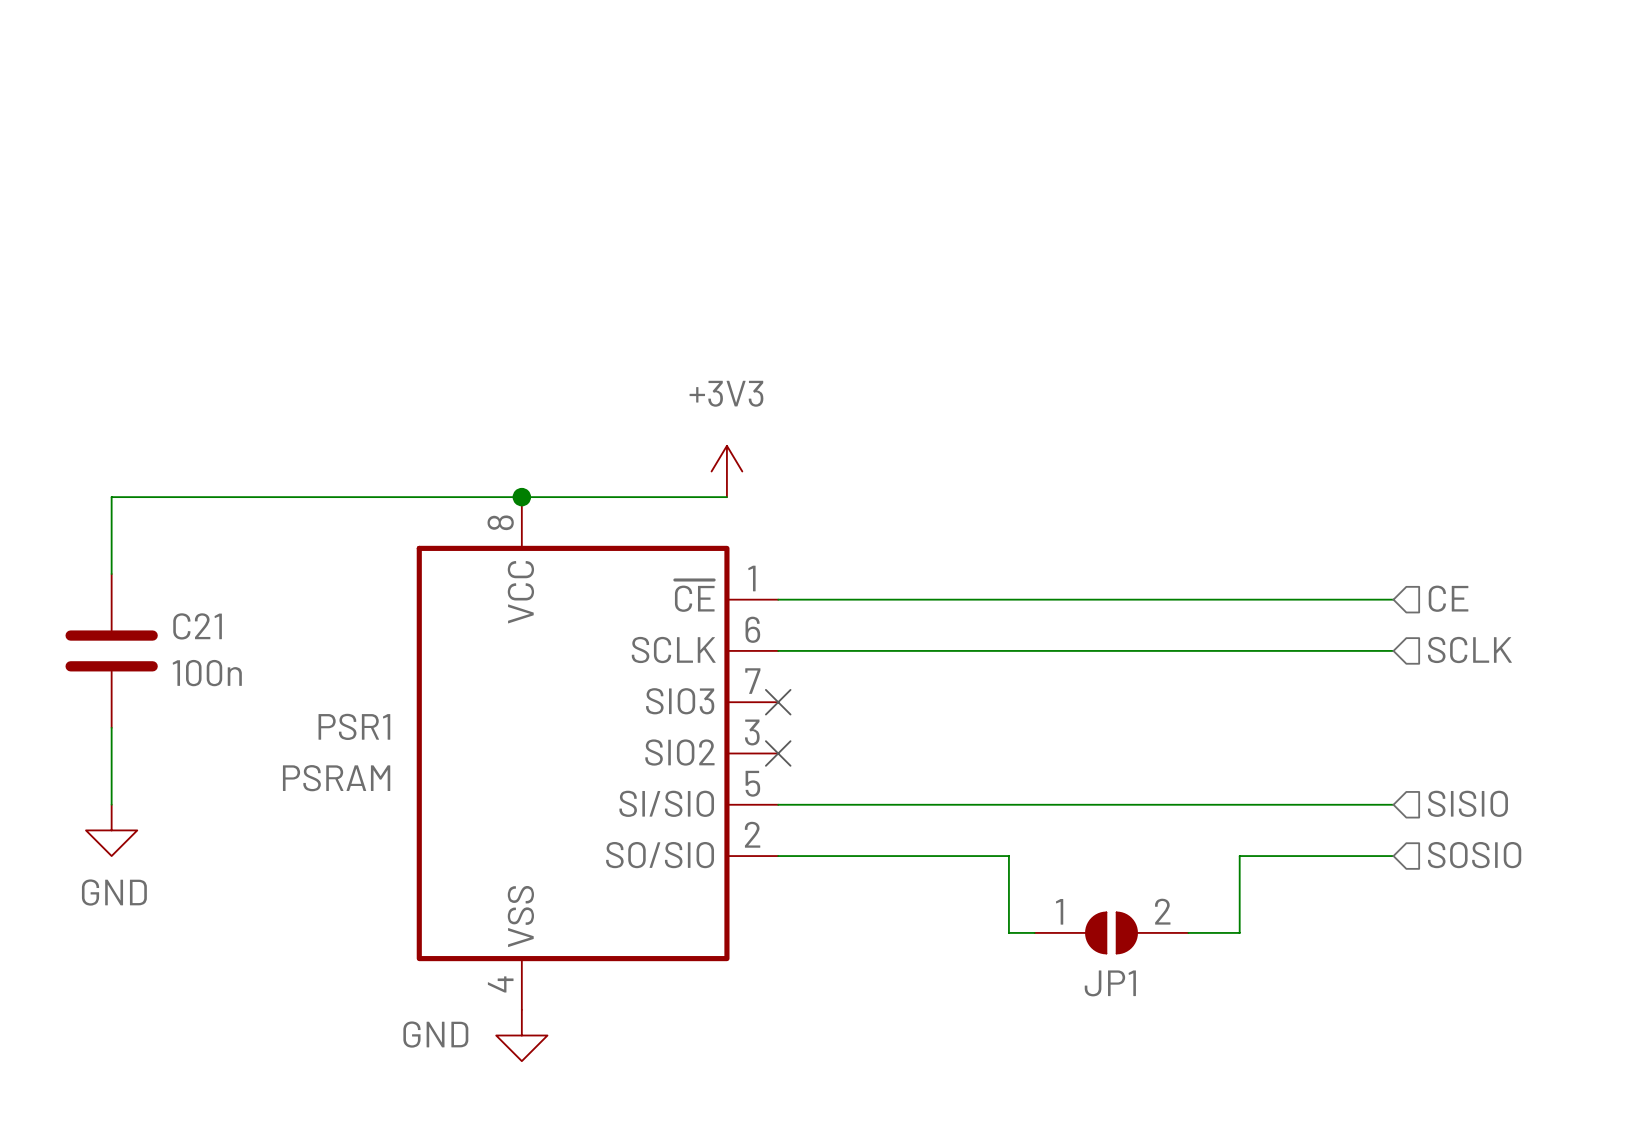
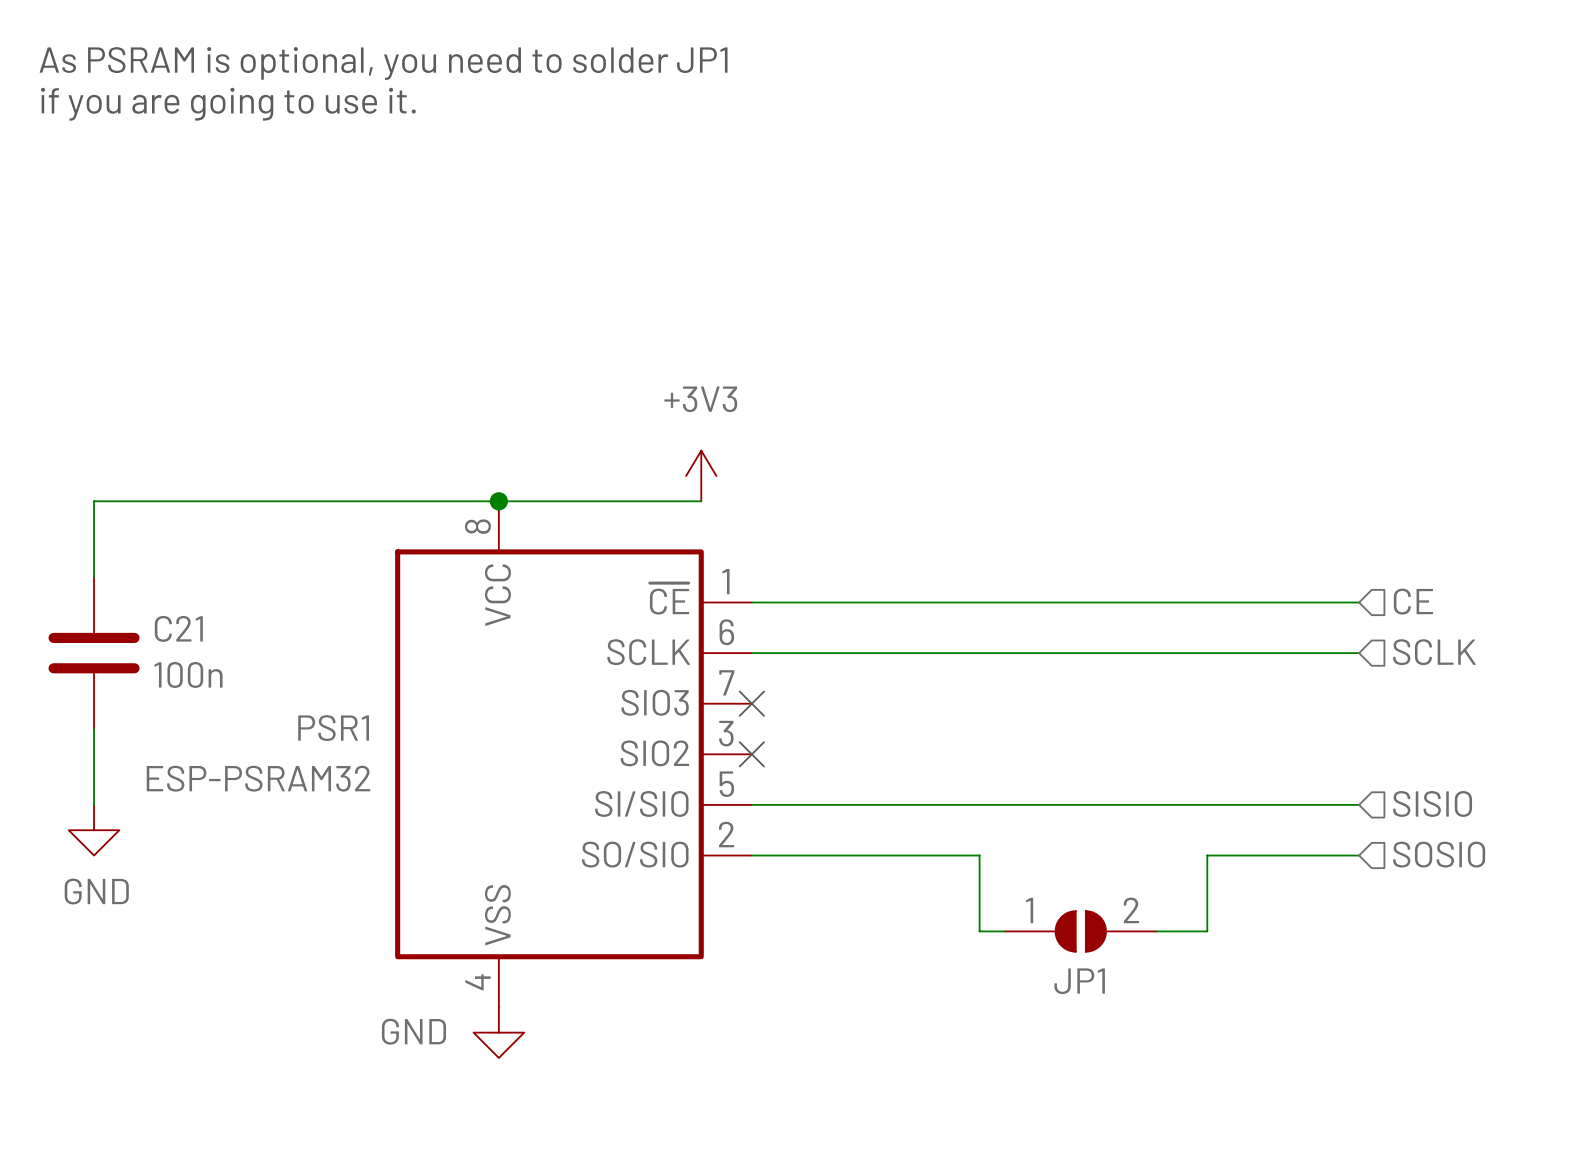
text: none -> As PSRAM is optional, you need to solder JP1 (383, 63)
text: none -> if you are going to use it. (228, 104)
PSR1 value: PSRAM (336, 778) -> ESP-PSRAM32 (258, 778)

